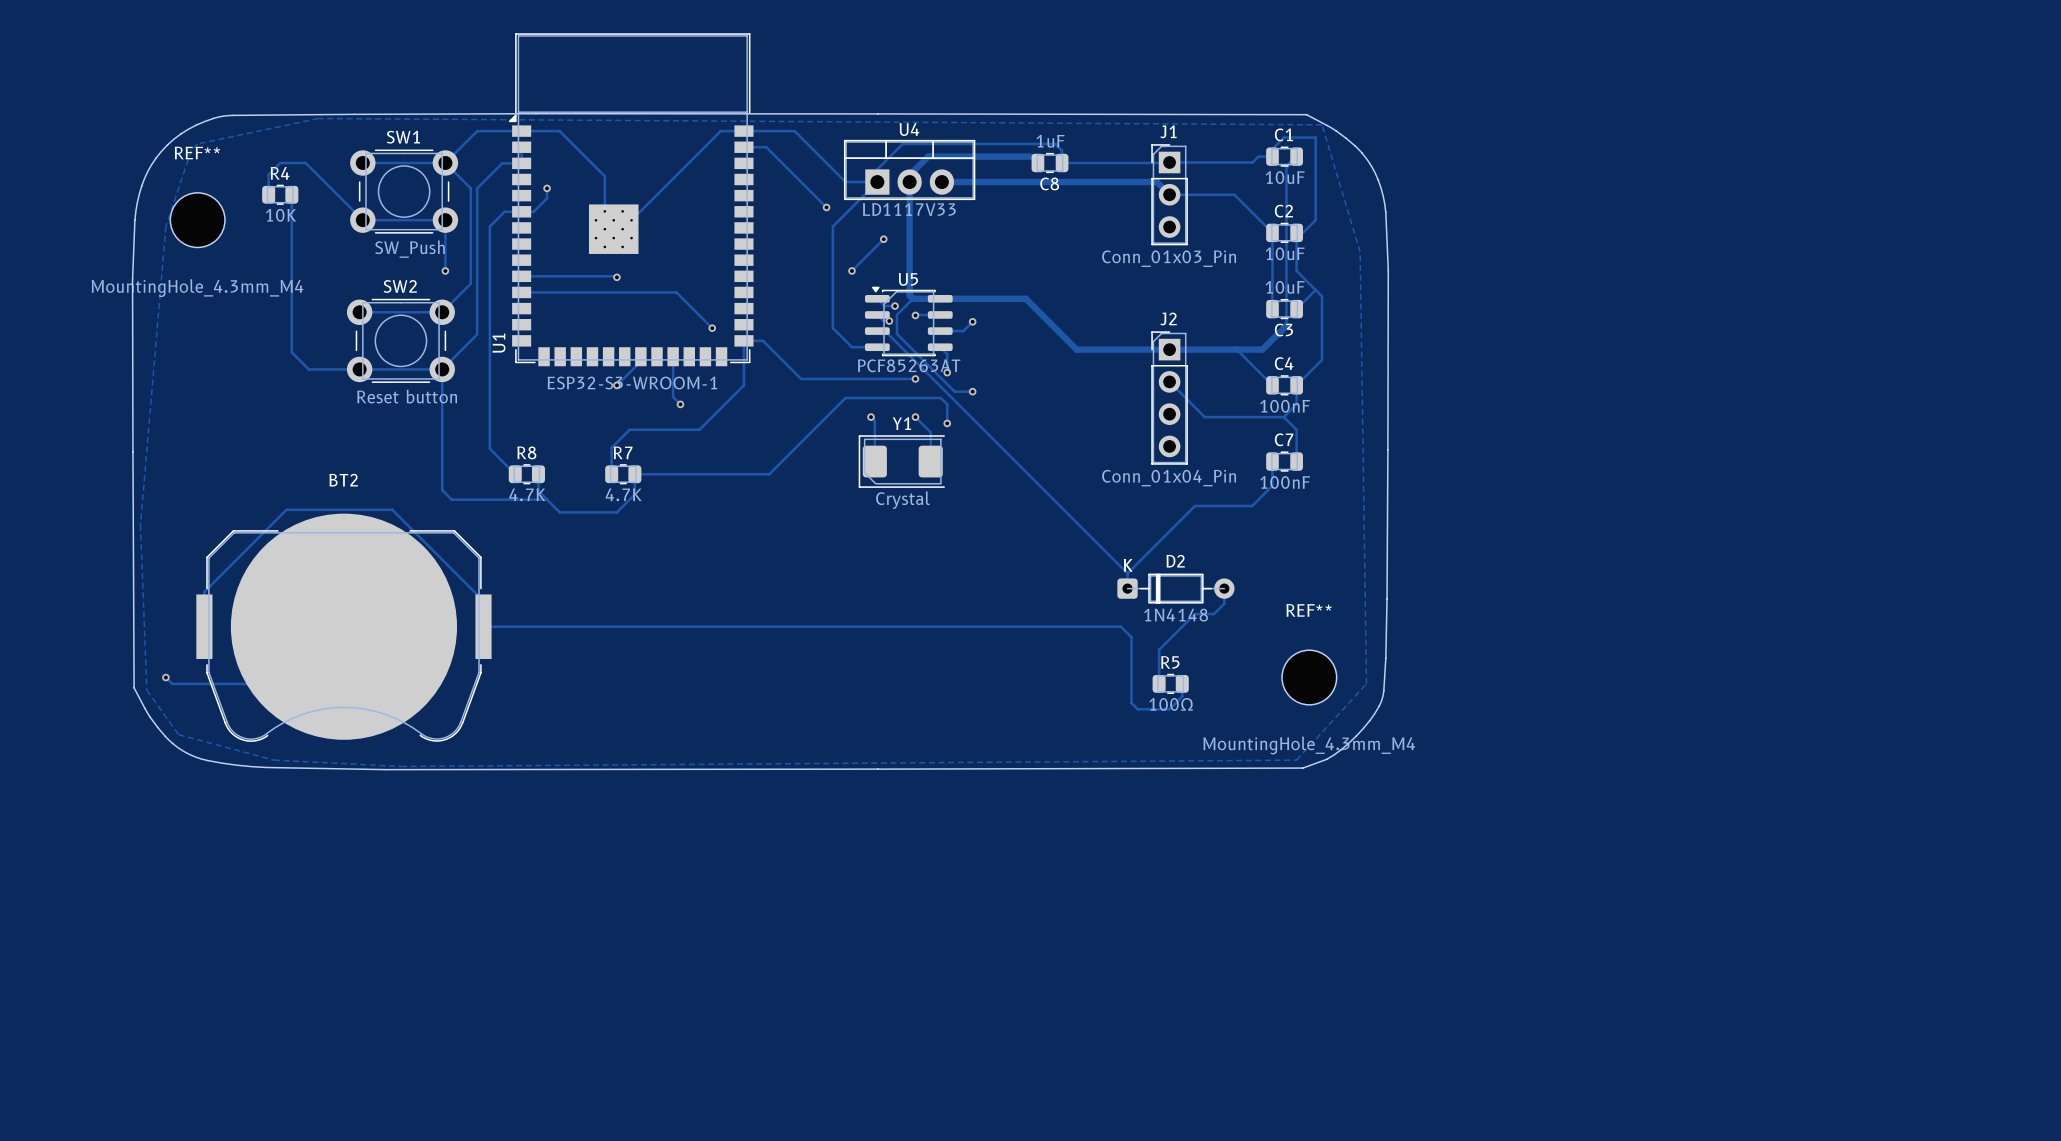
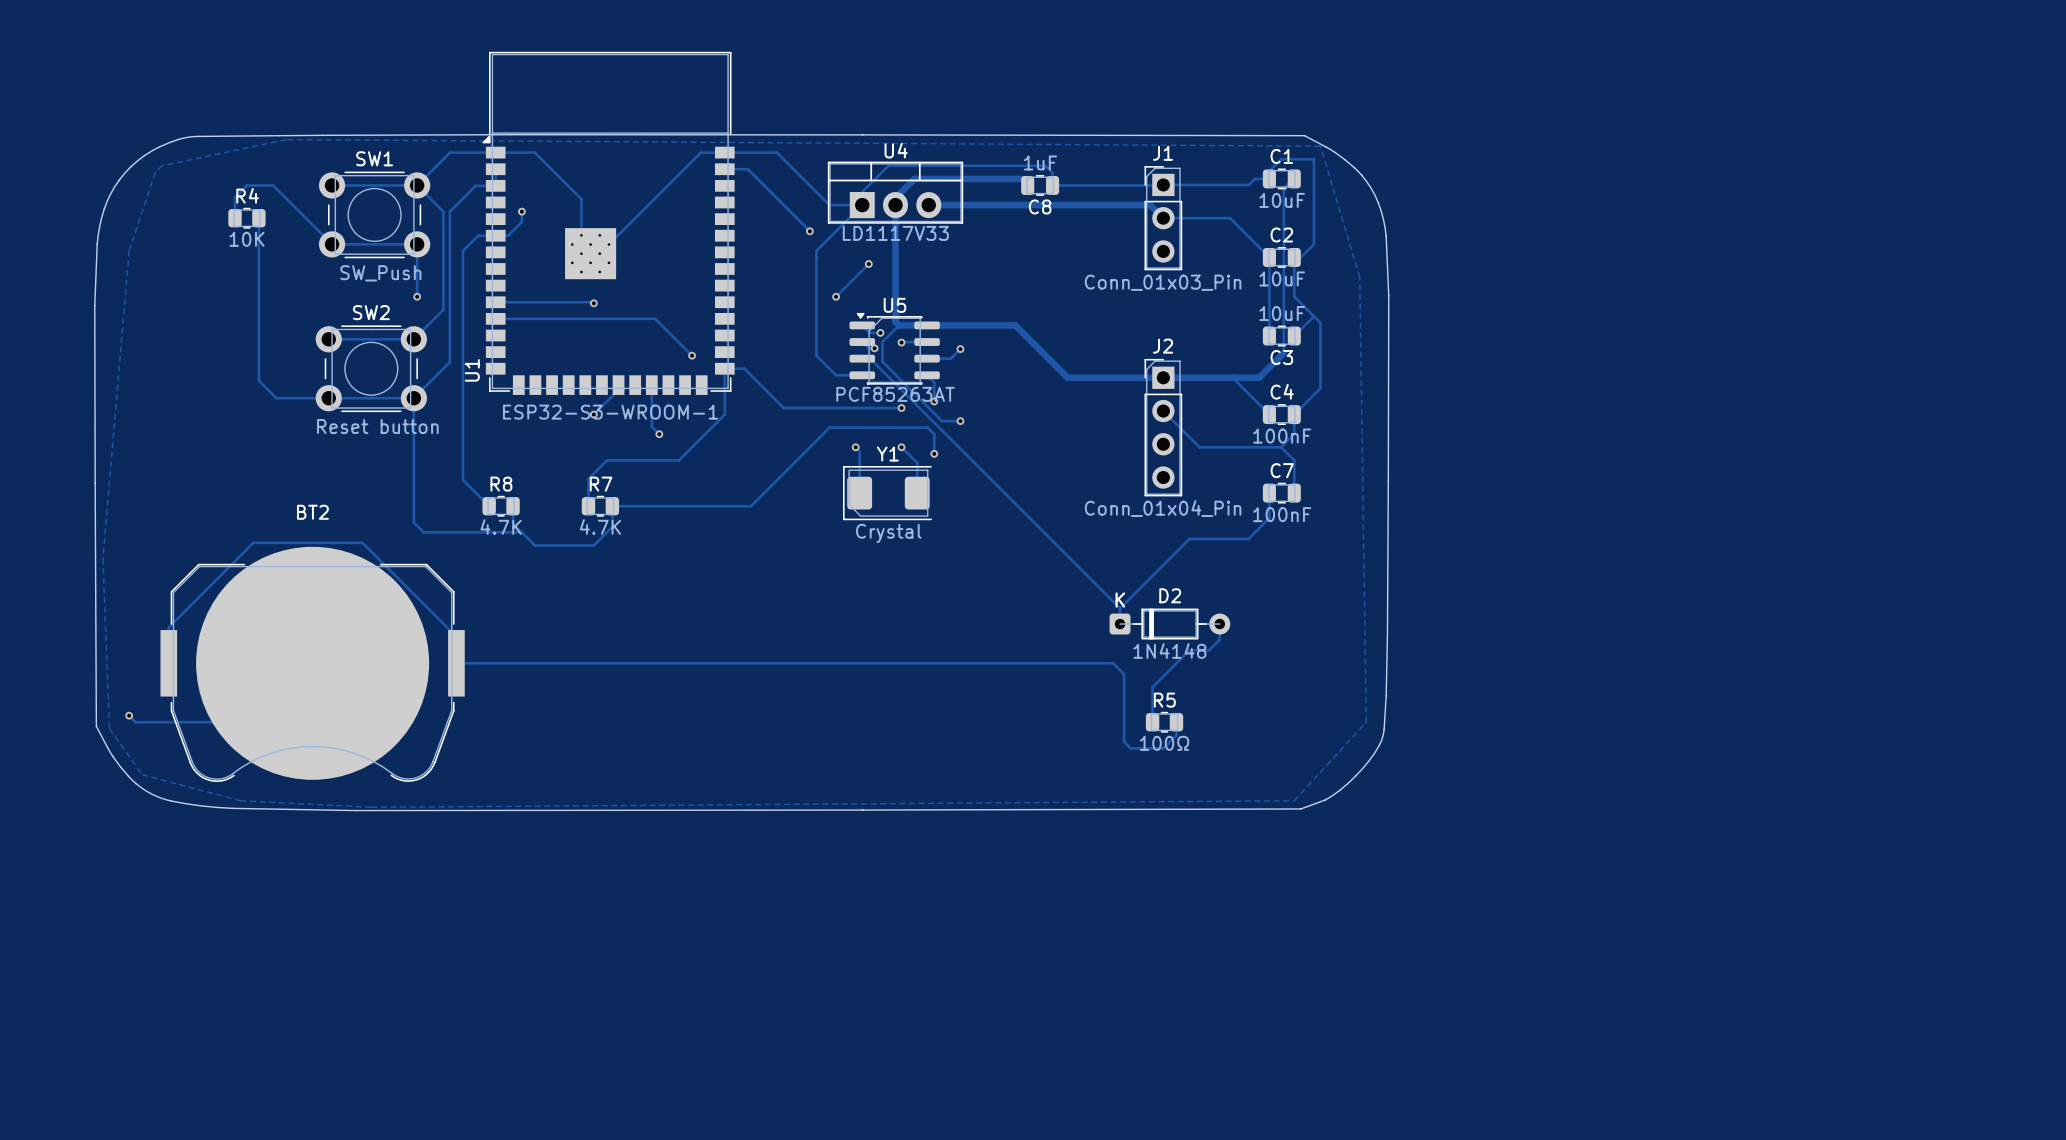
REF**: MountingHole_4.3mm_M4 (197, 220) -> none
REF**: MountingHole_4.3mm_M4 (1309, 677) -> none

